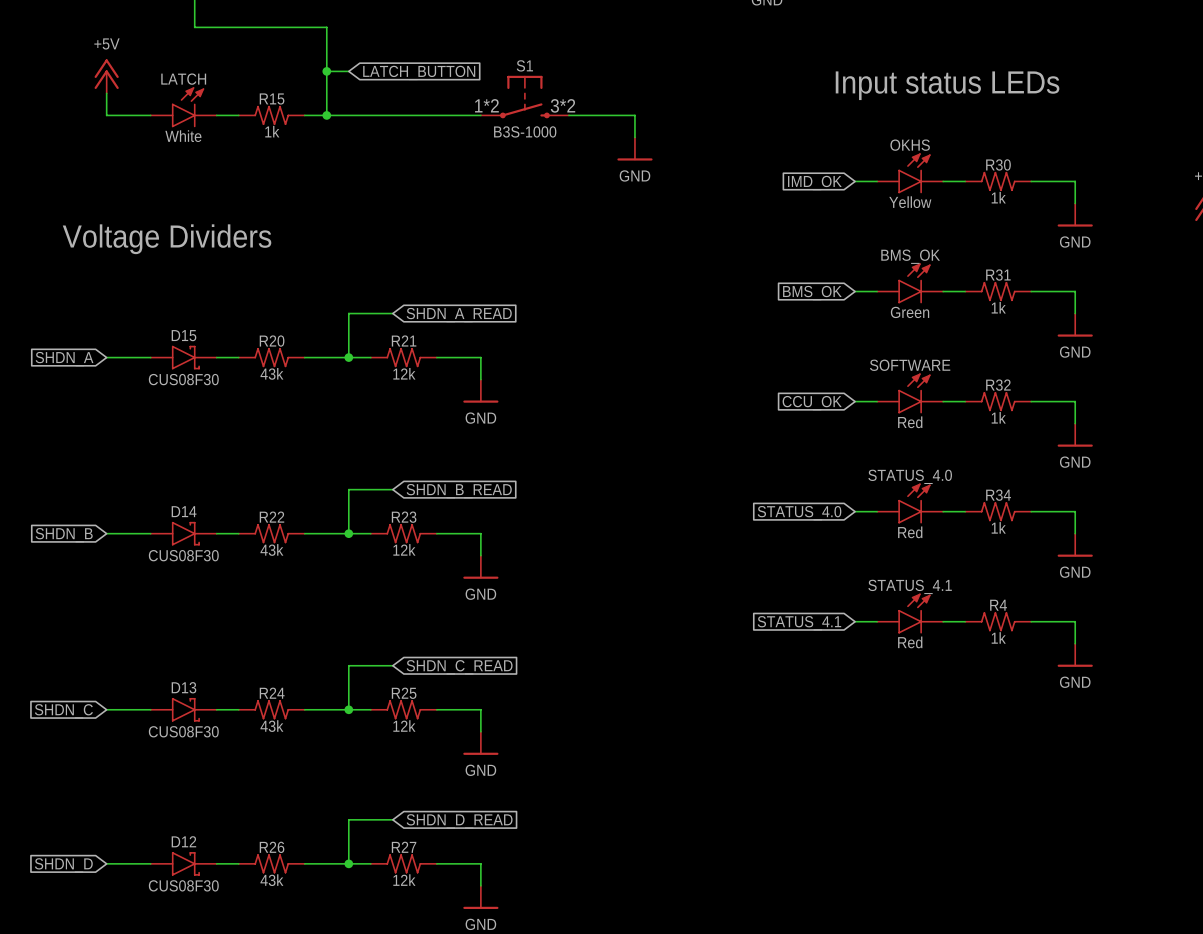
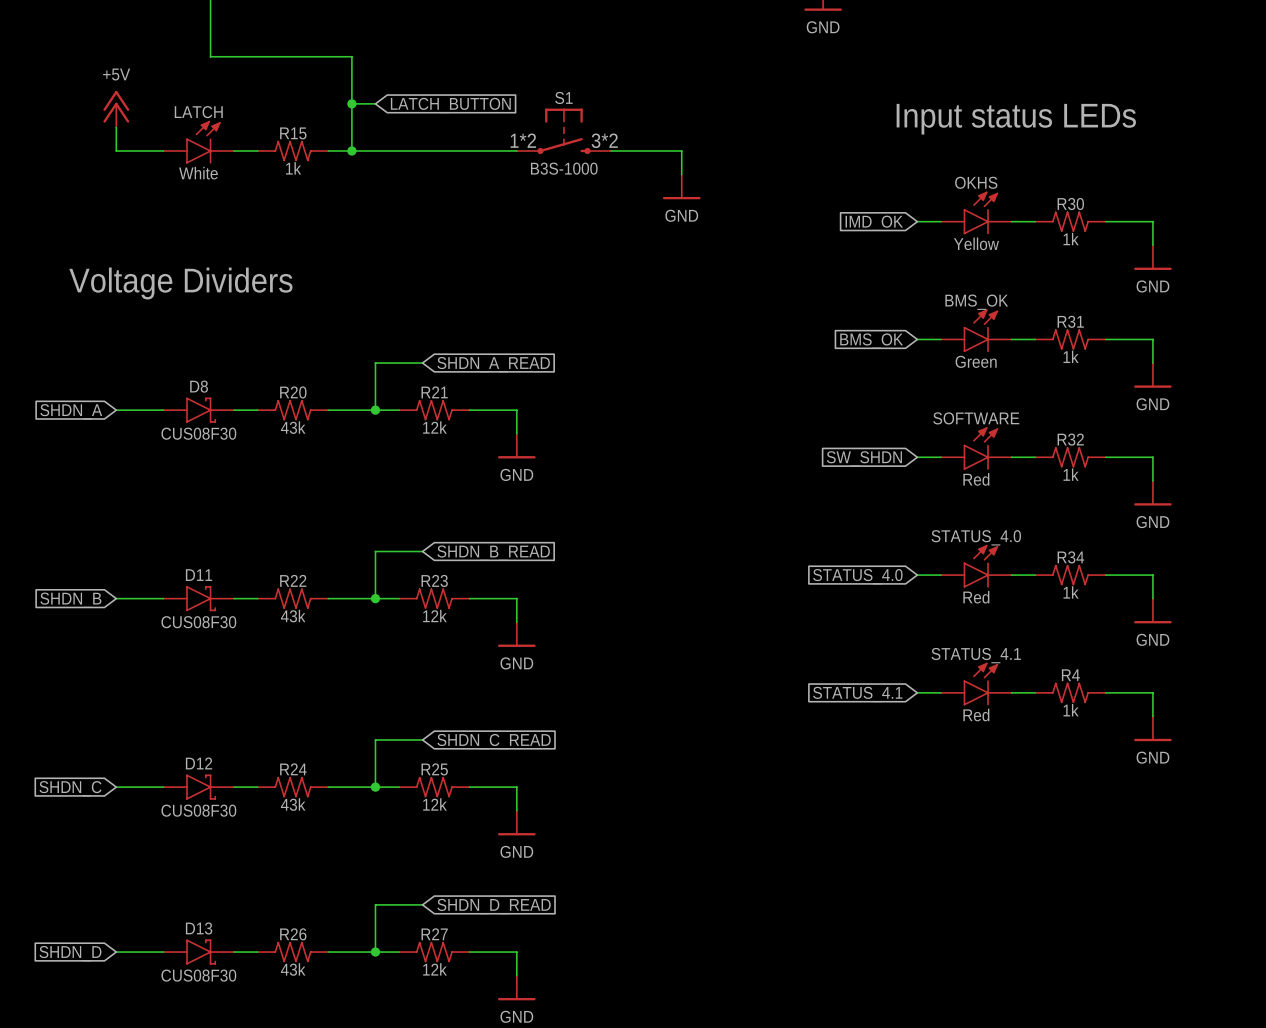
D15 name: D15 (184, 335) -> D8 (199, 386)
global label: CCU_OK (812, 403) -> SW_SHDN (864, 458)
D14 name: D14 (184, 511) -> D11 (199, 575)
D13 name: D13 (183, 687) -> D12 (199, 763)
D12 name: D12 (183, 841) -> D13 (199, 928)

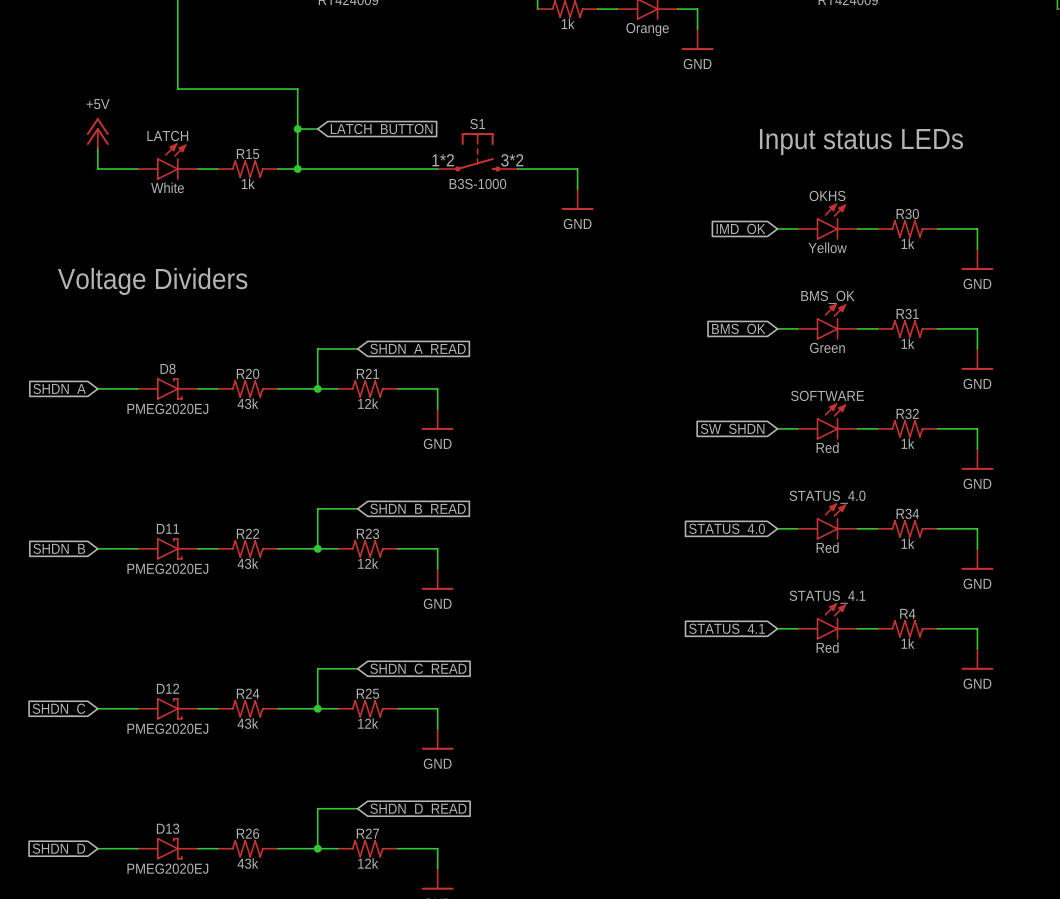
D8 text: CUS08F30 (198, 433) -> PMEG2020EJ (167, 408)
D11 text: CUS08F30 (198, 622) -> PMEG2020EJ (167, 568)
D12 text: CUS08F30 (198, 810) -> PMEG2020EJ (167, 728)
D13 text: CUS08F30 (198, 975) -> PMEG2020EJ (167, 868)

